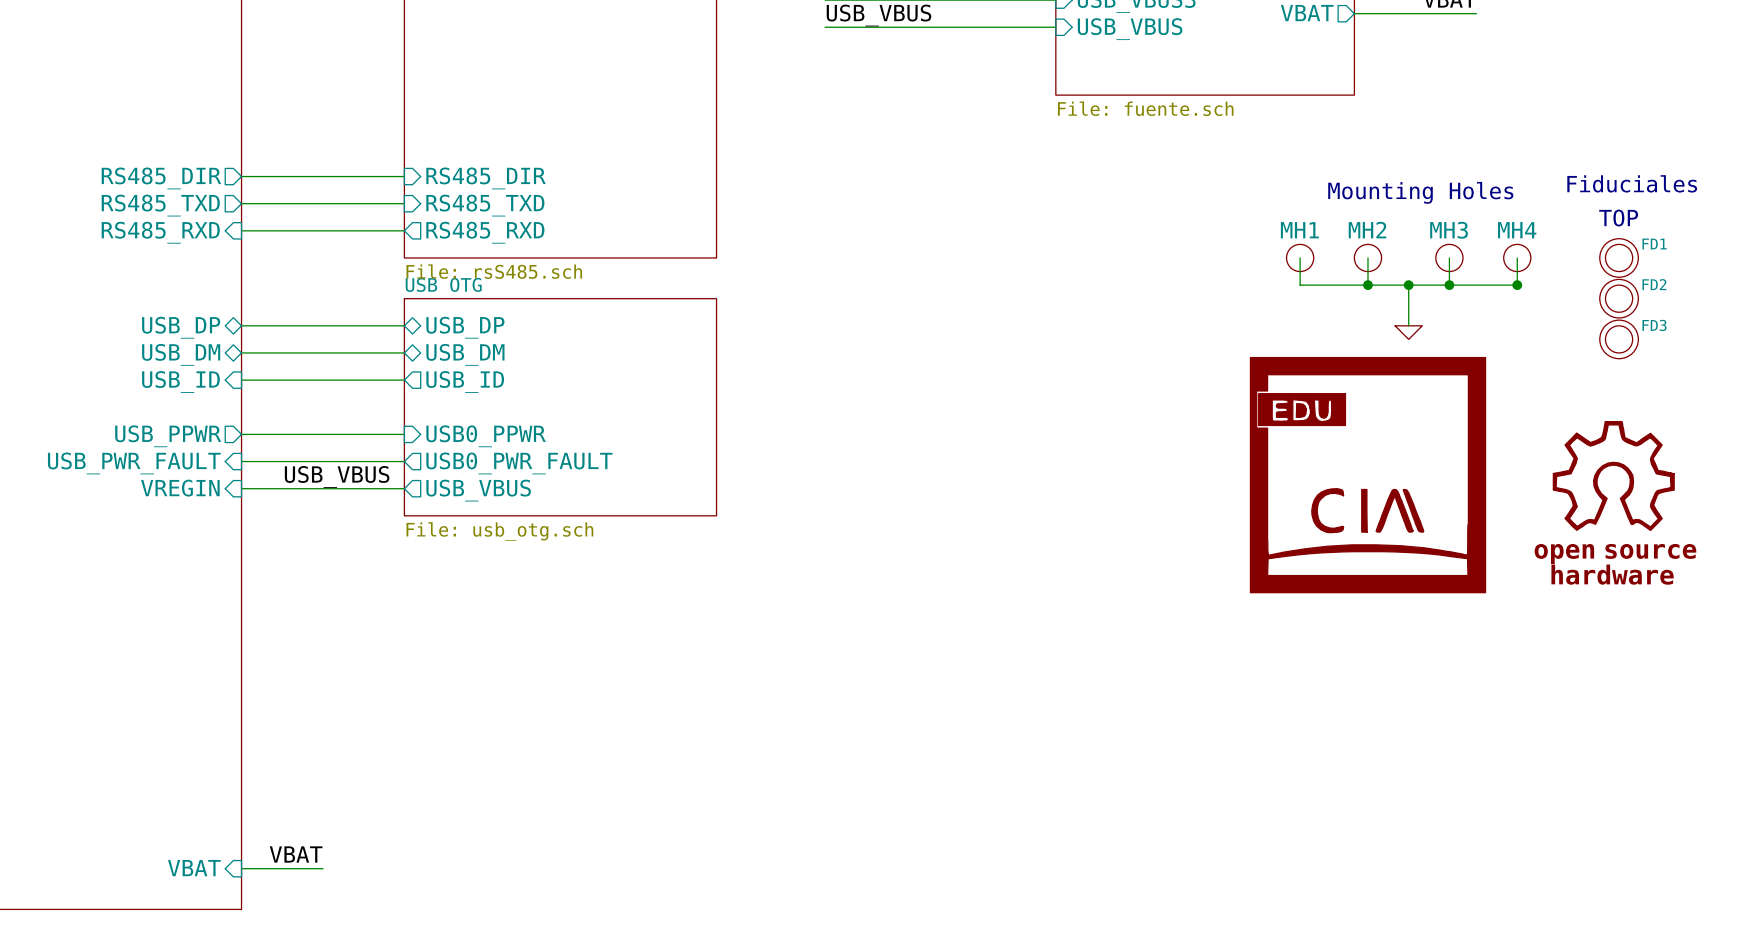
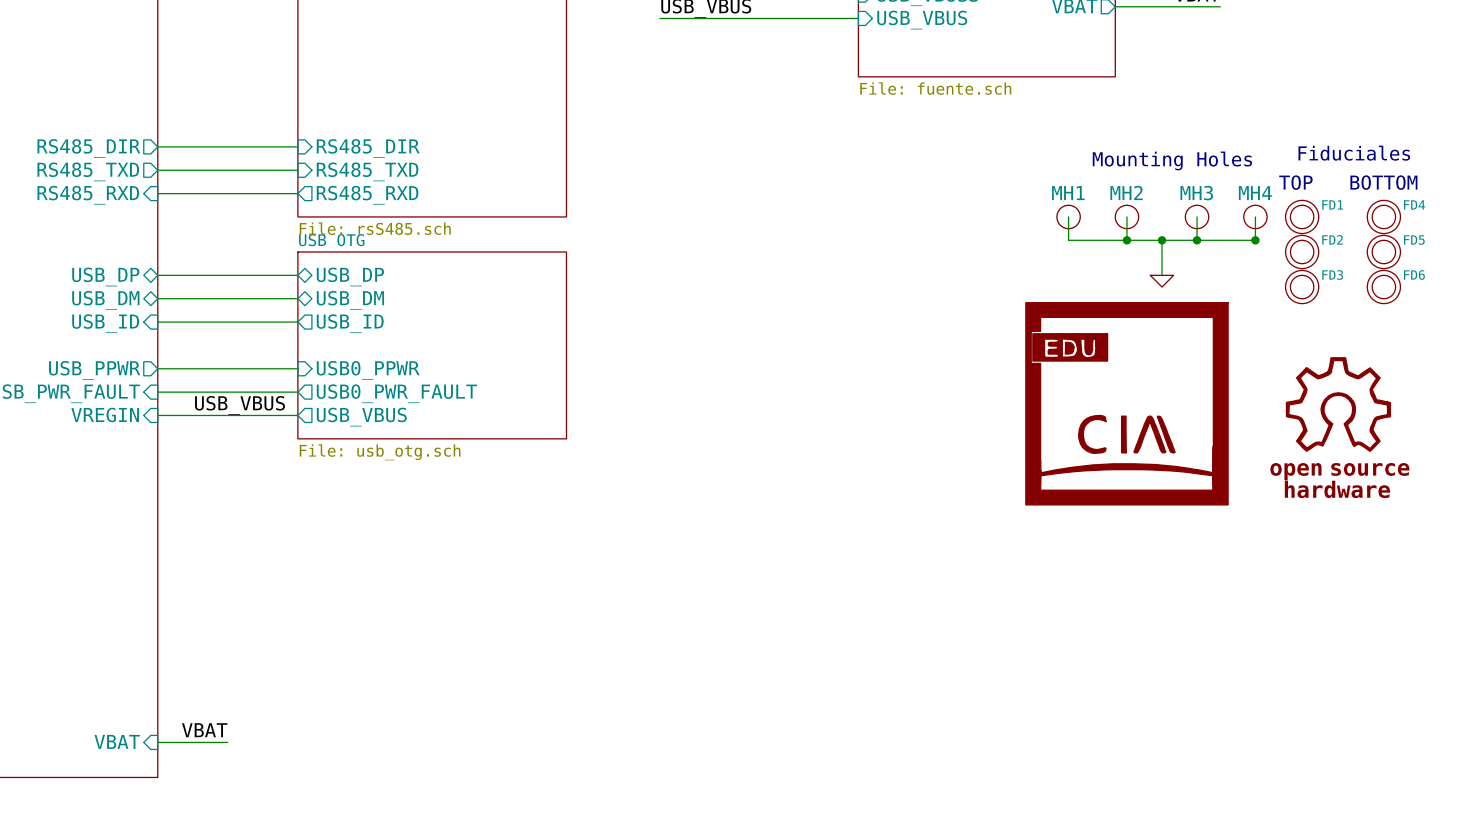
text position: TOP (1618, 218) -> TOP (1295, 182)
text: none -> BOTTOM (1383, 182)
FD1 position: (1619, 257) -> (1302, 216)
FD4: none -> (1383, 216)
FD2 position: (1619, 298) -> (1302, 252)
FD5: none -> (1383, 252)
FD3 position: (1619, 339) -> (1302, 287)
FD6: none -> (1383, 287)

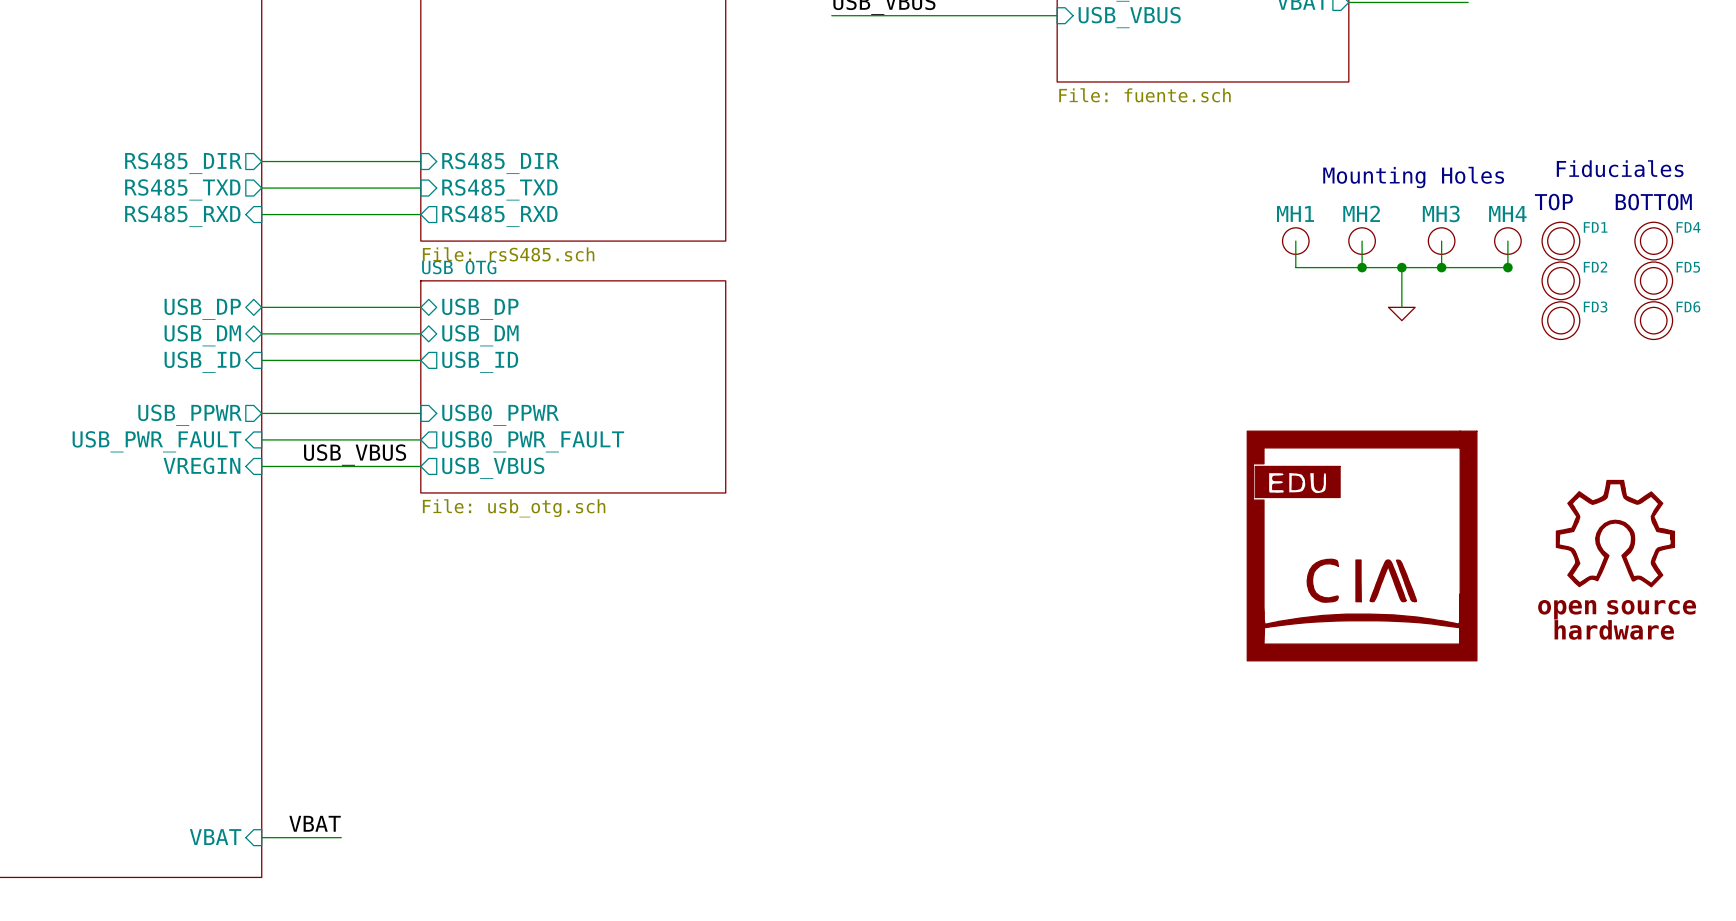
part position: (1126, 403) -> (1362, 546)
part position: (1338, 404) -> (1615, 533)

